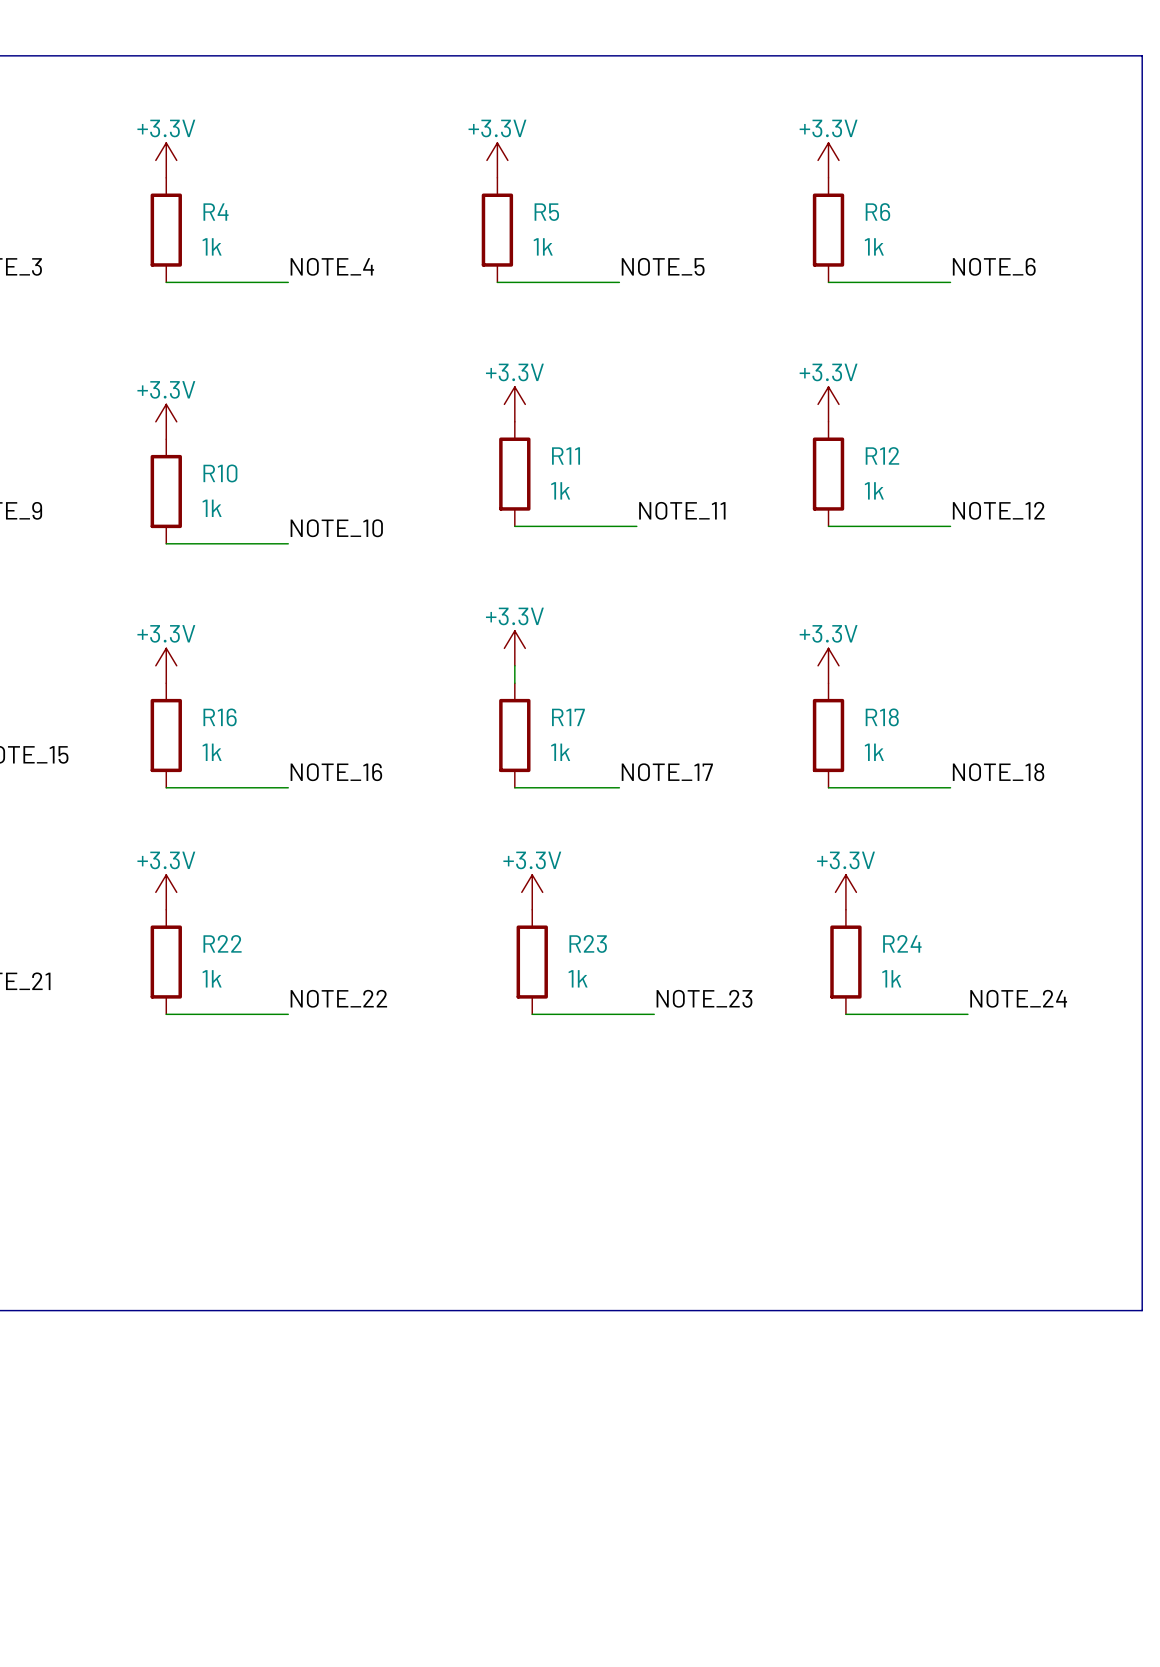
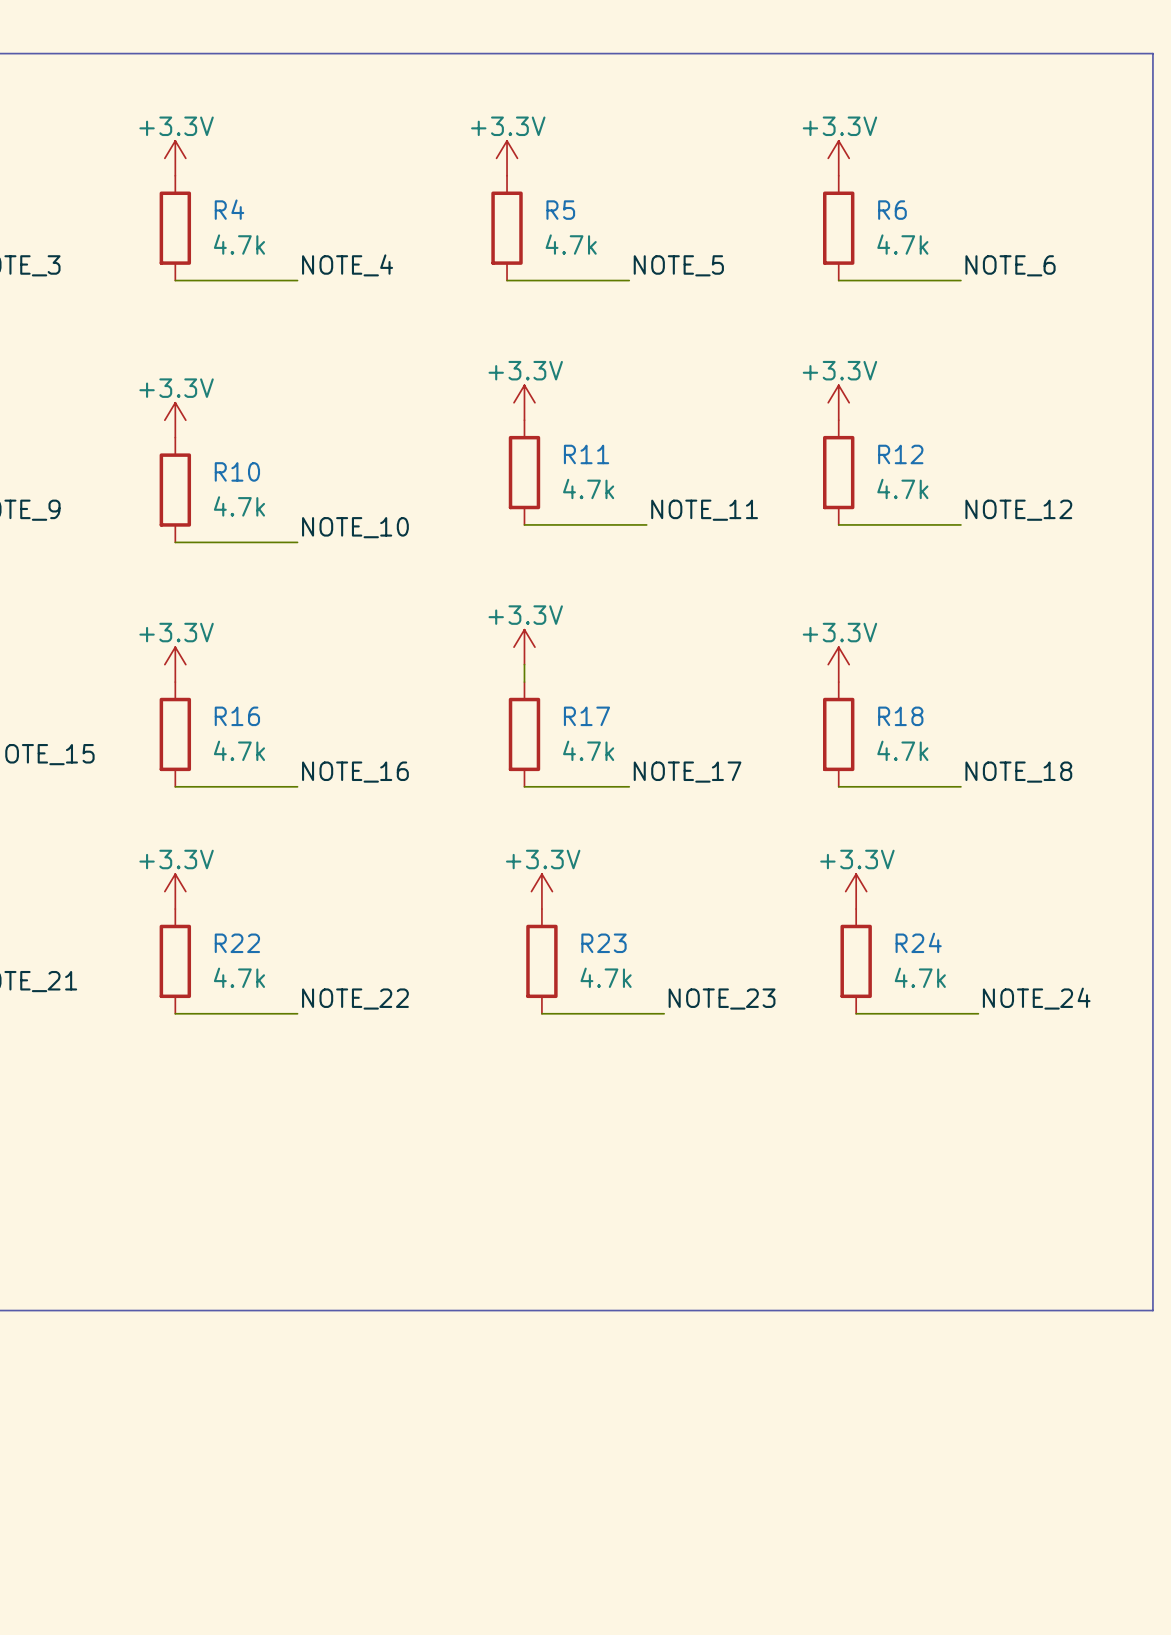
R4 value: 1k (212, 246) -> 4.7k (239, 244)
R5 value: 1k (543, 246) -> 4.7k (571, 244)
R6 value: 1k (874, 246) -> 4.7k (902, 244)
R11 value: 1k (560, 490) -> 4.7k (588, 488)
R12 value: 1k (874, 490) -> 4.7k (902, 488)
R10 value: 1k (212, 508) -> 4.7k (239, 506)
R16 value: 1k (212, 752) -> 4.7k (239, 750)
R17 value: 1k (560, 752) -> 4.7k (588, 750)
R18 value: 1k (874, 752) -> 4.7k (902, 750)
R22 value: 1k (212, 978) -> 4.7k (239, 977)
R23 value: 1k (578, 978) -> 4.7k (606, 977)
R24 value: 1k (891, 978) -> 4.7k (920, 977)

